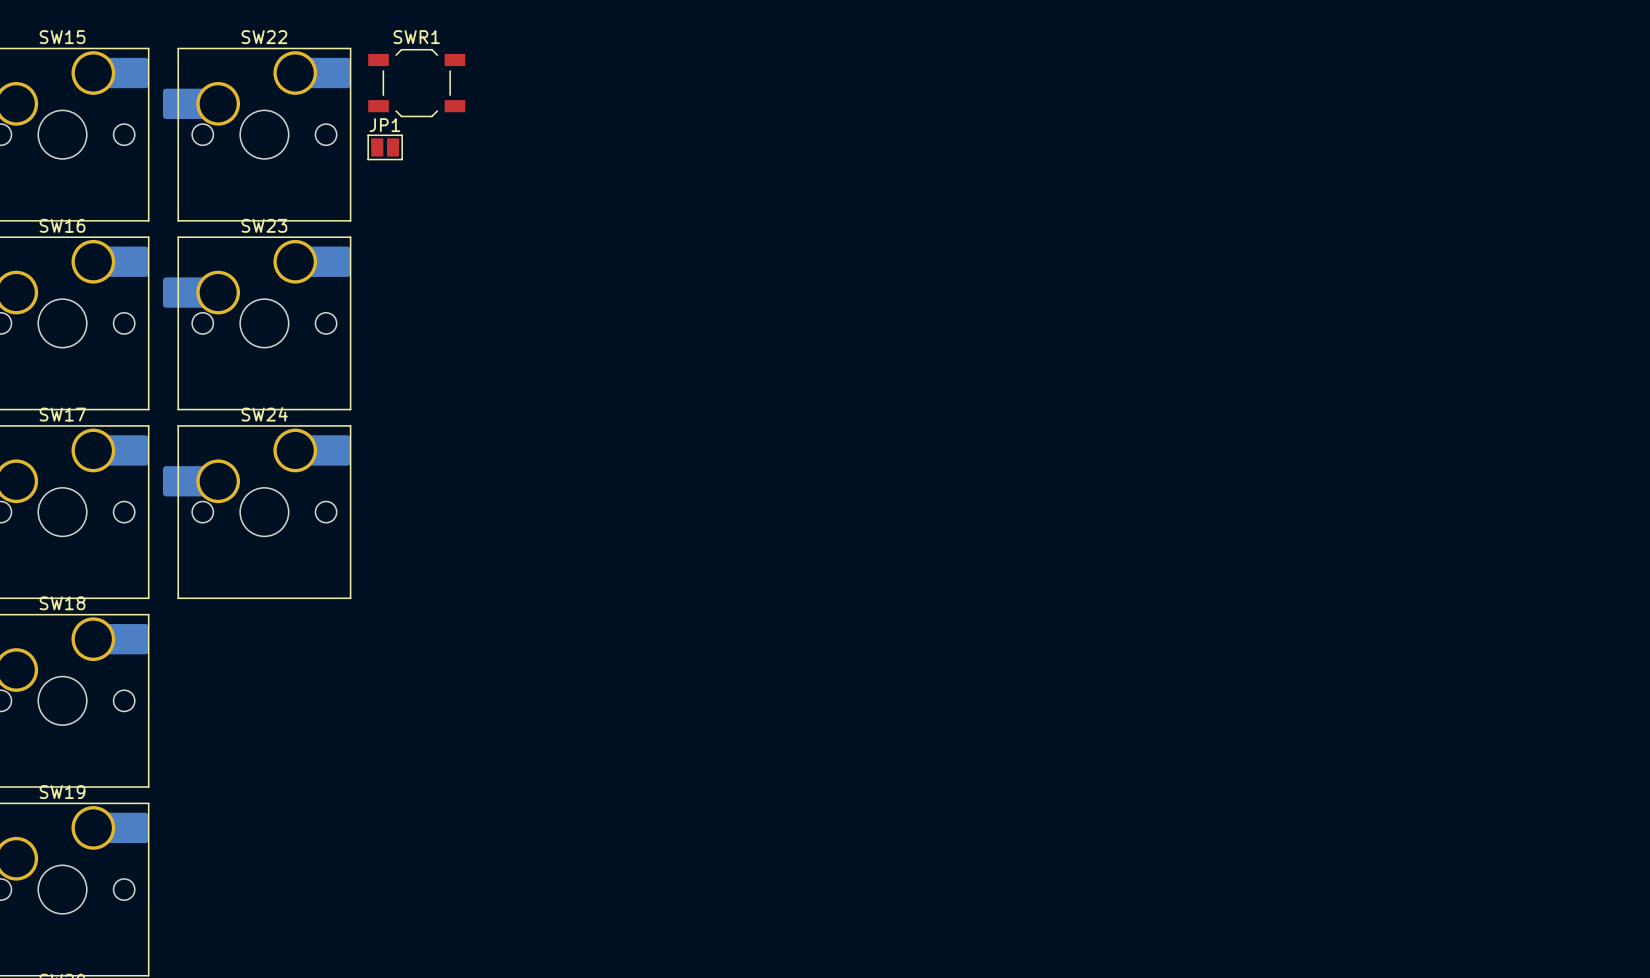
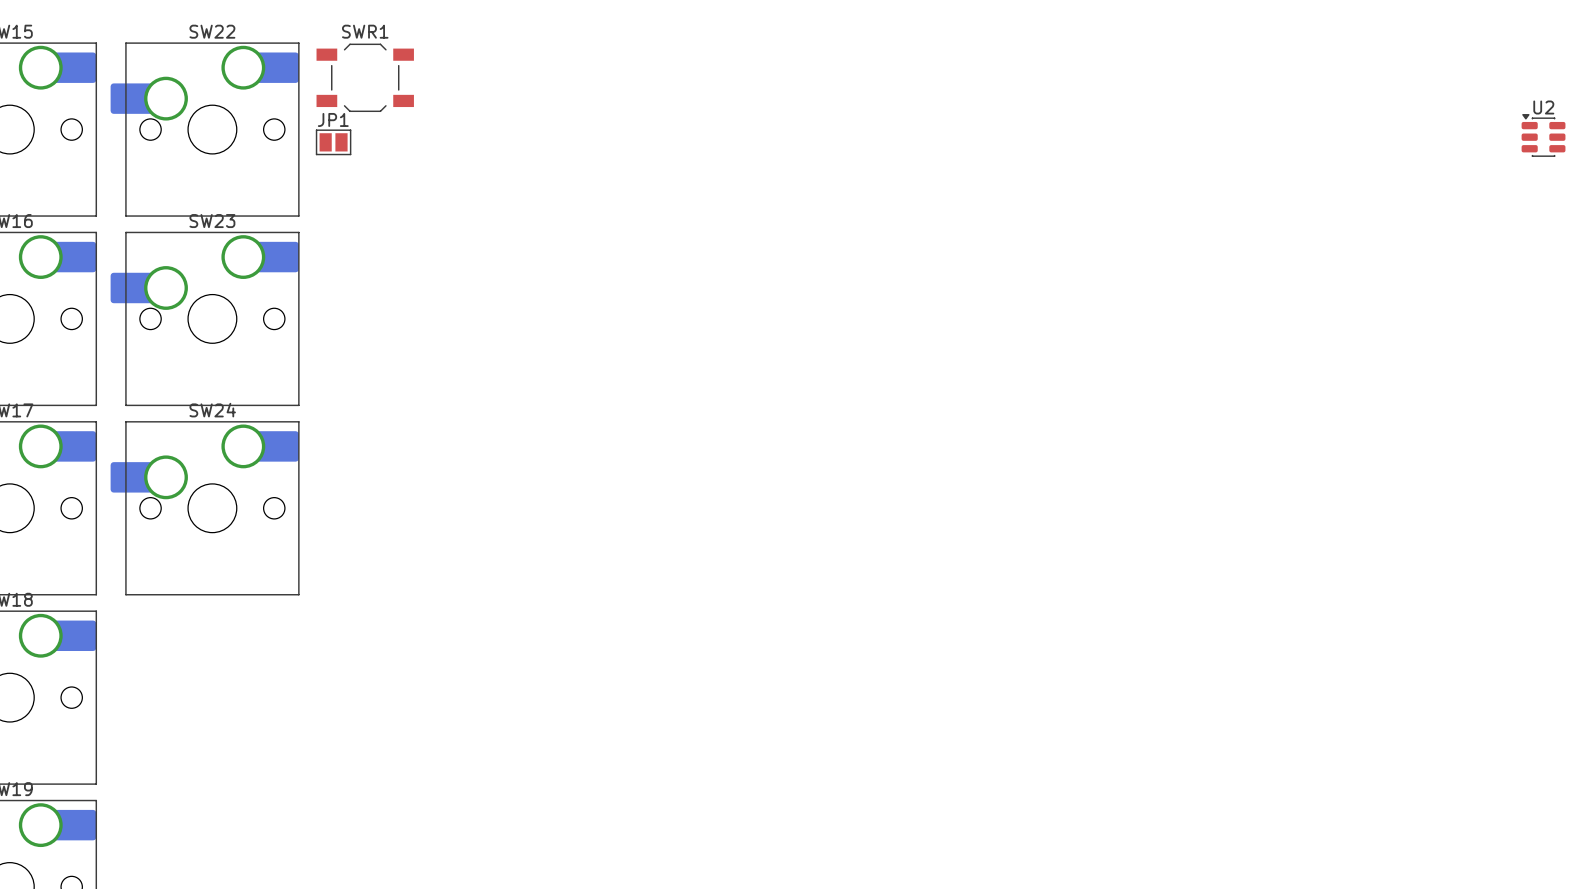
U2: none -> (1543, 135)

